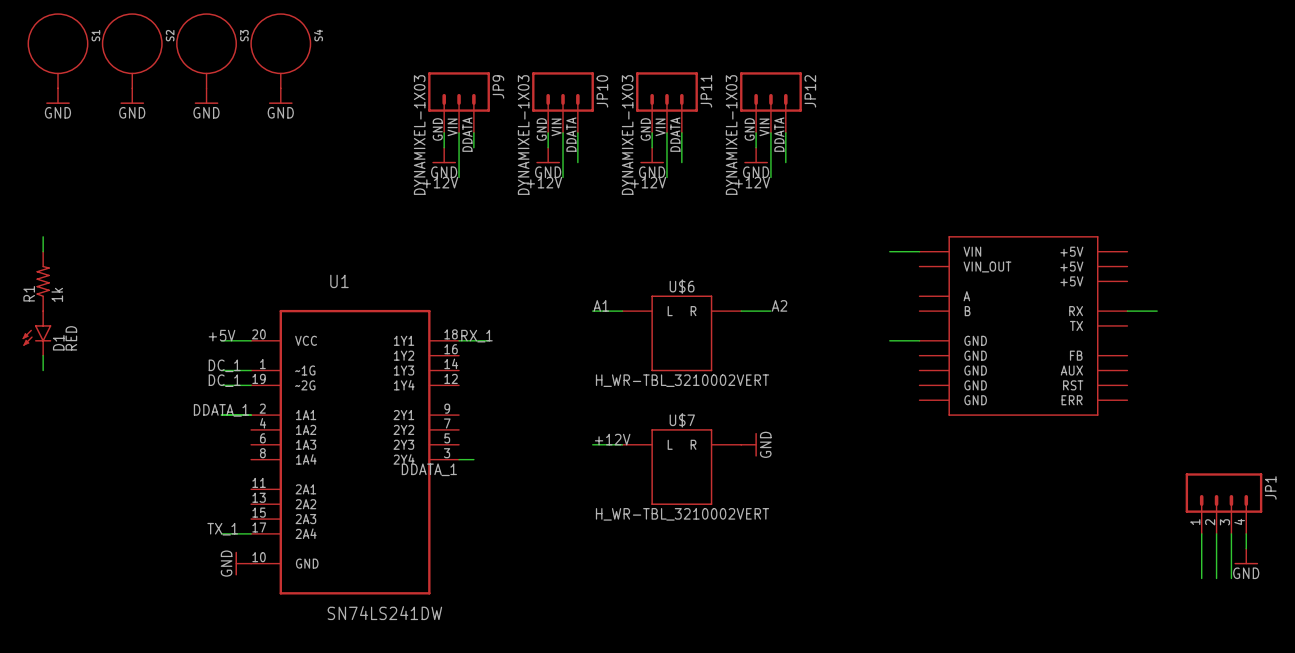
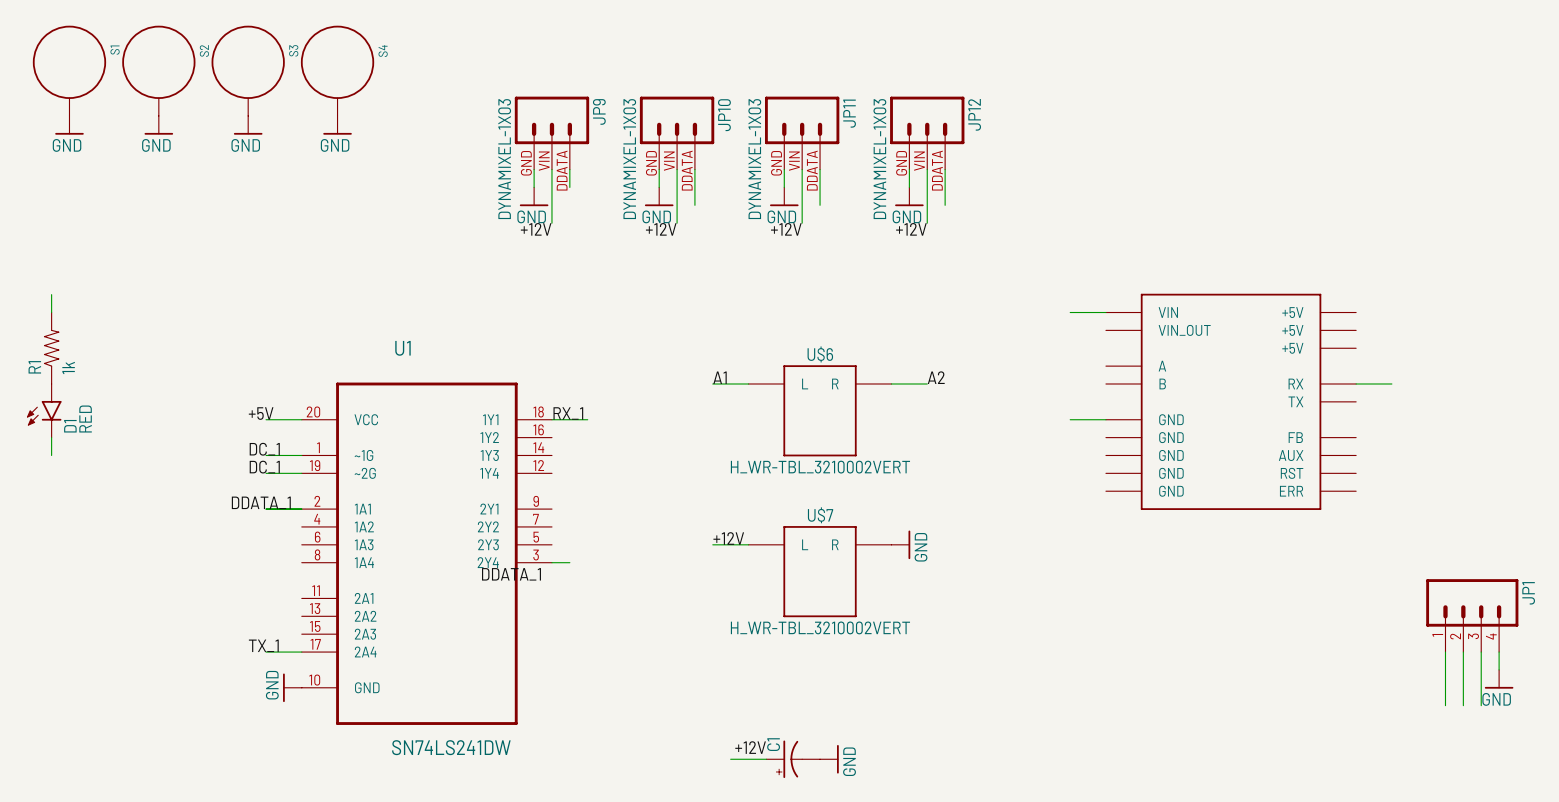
label: none -> +12V (750, 747)
wire: none -> (730, 759) (766, 759)
C1: none -> (793, 759)
power symbol: none -> GND (829, 759)

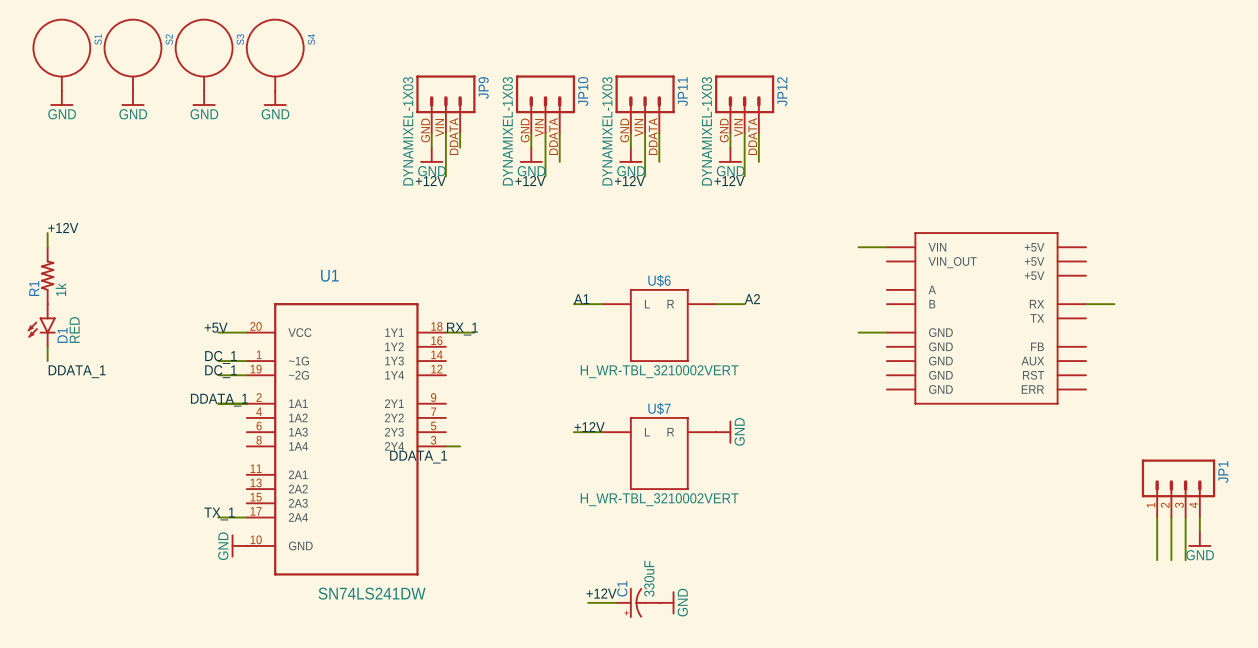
label: none -> +12V (63, 227)
label: none -> DDATA_1 (77, 371)
C1 value: none -> 330uF (649, 578)

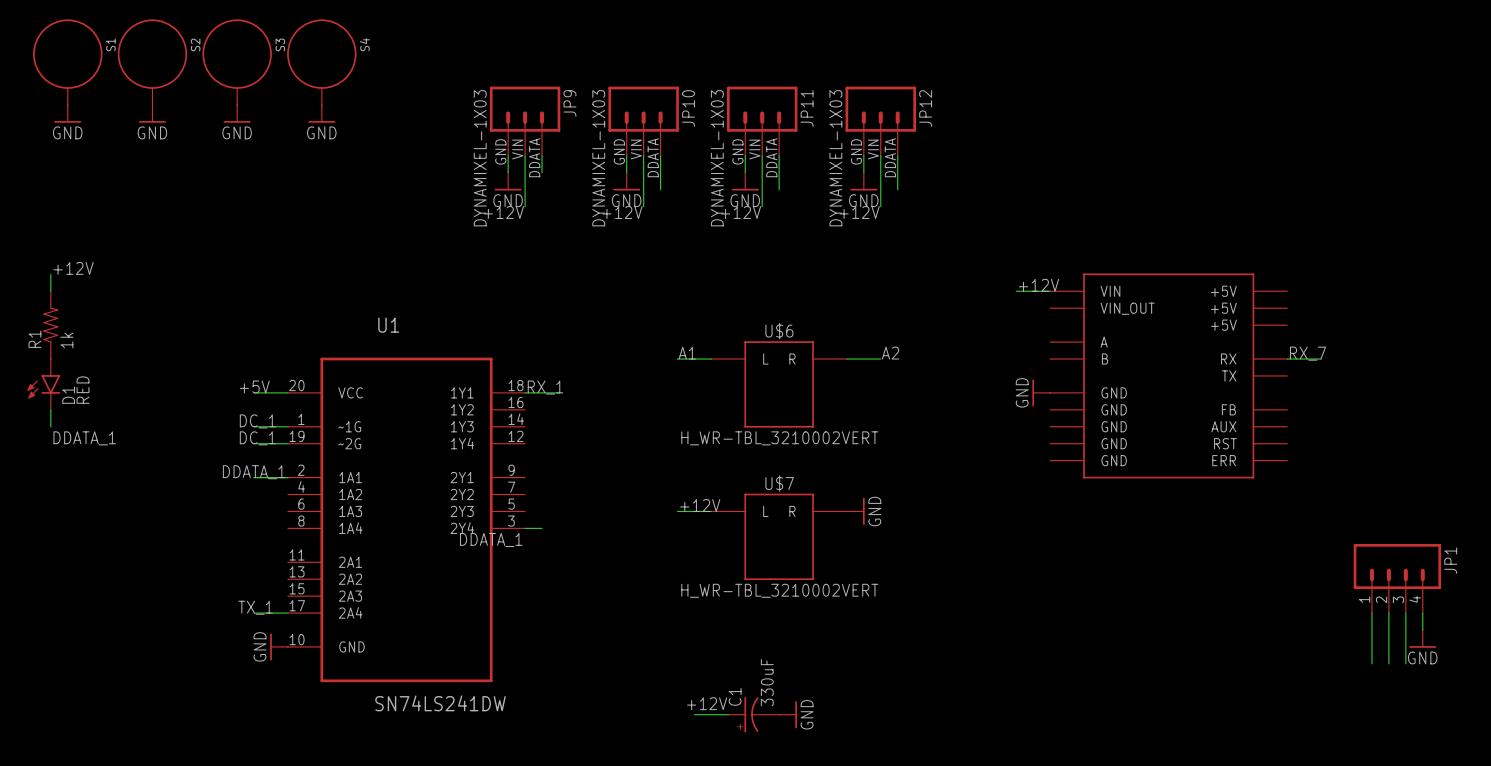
label: none -> +12V (1039, 285)
label: none -> RX_7 (1307, 353)
power symbol: none -> GND (1041, 392)

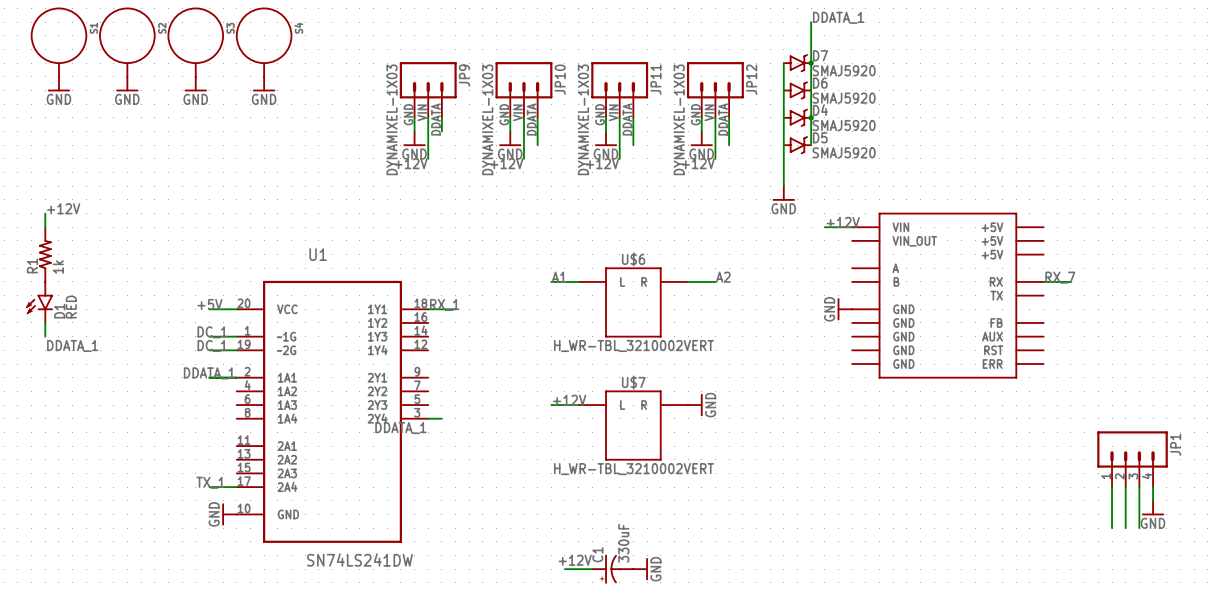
label: none -> DDATA_1 (838, 17)
wire: none -> (811, 22) (811, 145)
wire: none -> (783, 63) (783, 186)
D7: none -> SMAJ5920 (797, 63)
junction: none -> (811, 63)
D6: none -> SMAJ5920 (797, 90)
D4: none -> SMAJ5920 (797, 117)
junction: none -> (811, 117)
D5: none -> SMAJ5920 (797, 145)
power symbol: none -> GND (783, 193)

